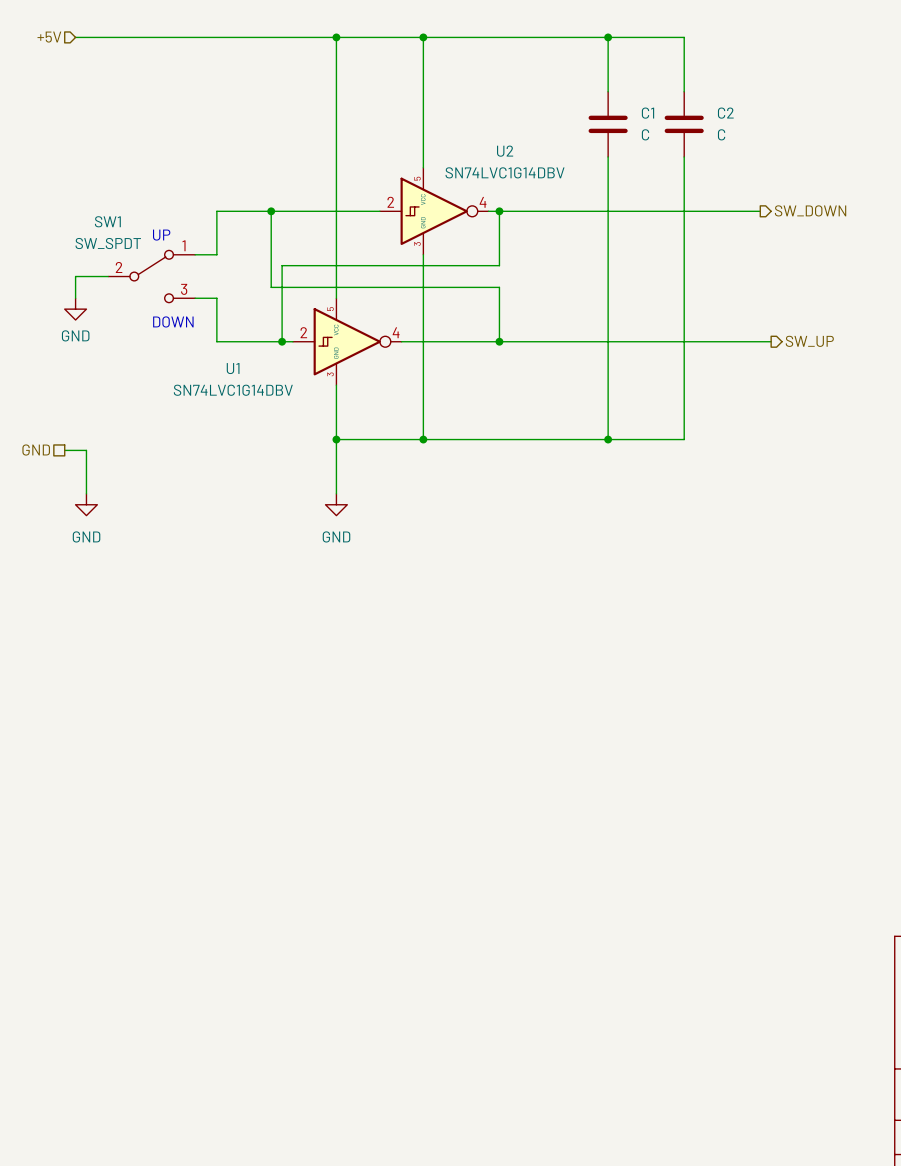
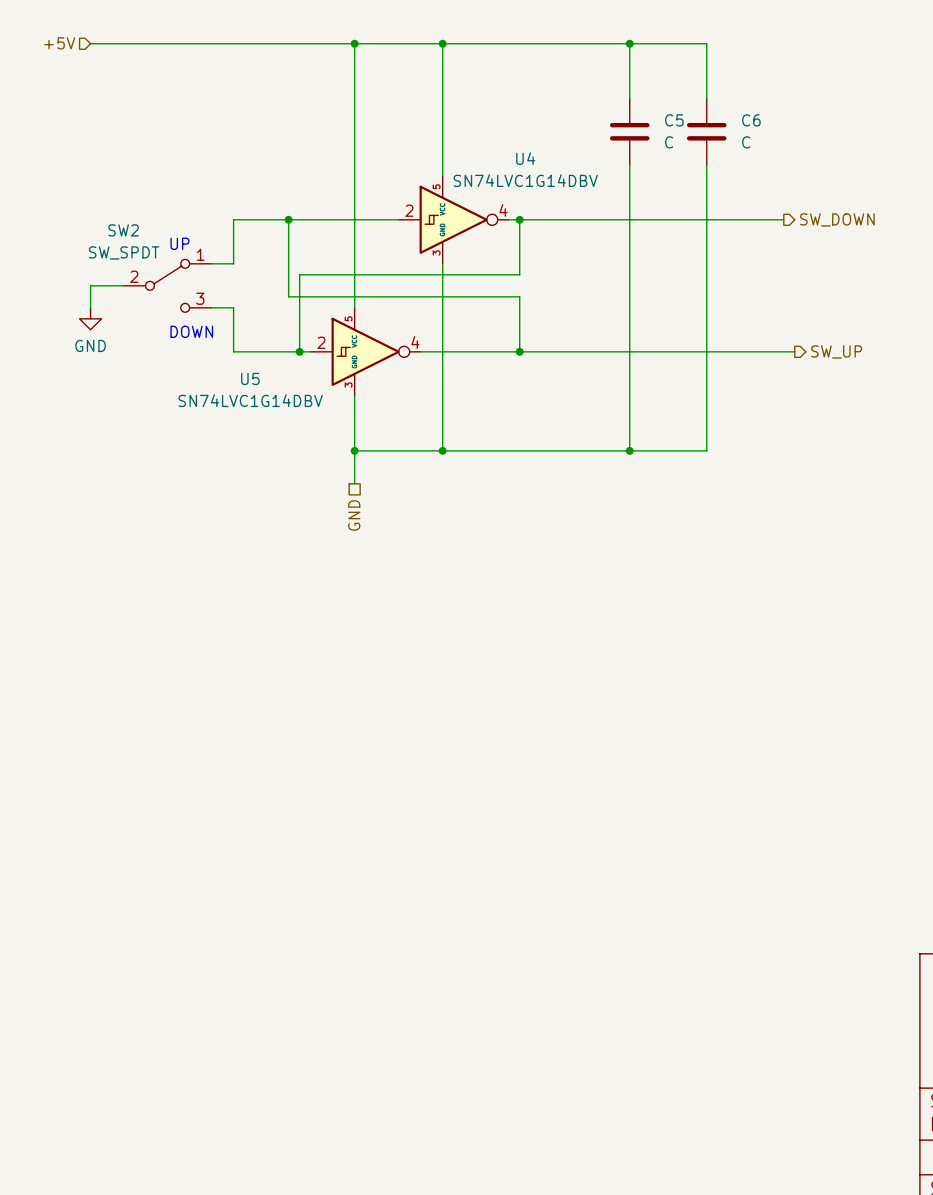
C1 name: C1 (648, 113) -> C5 (674, 120)
C2 name: C2 (725, 113) -> C6 (751, 120)
U2 name: U2 (505, 151) -> U4 (525, 158)
SW1 name: SW1 (107, 221) -> SW2 (123, 230)
U1 name: U1 (233, 368) -> U5 (250, 378)
hierarchical label: GND (36, 450) -> none
wire: (64, 450) (86, 450) (86, 493) -> none
wire: (336, 472) (336, 493) -> none
hierarchical label: none -> GND (354, 515)
power symbol: GND (86, 504) -> none
power symbol: GND (336, 504) -> none

